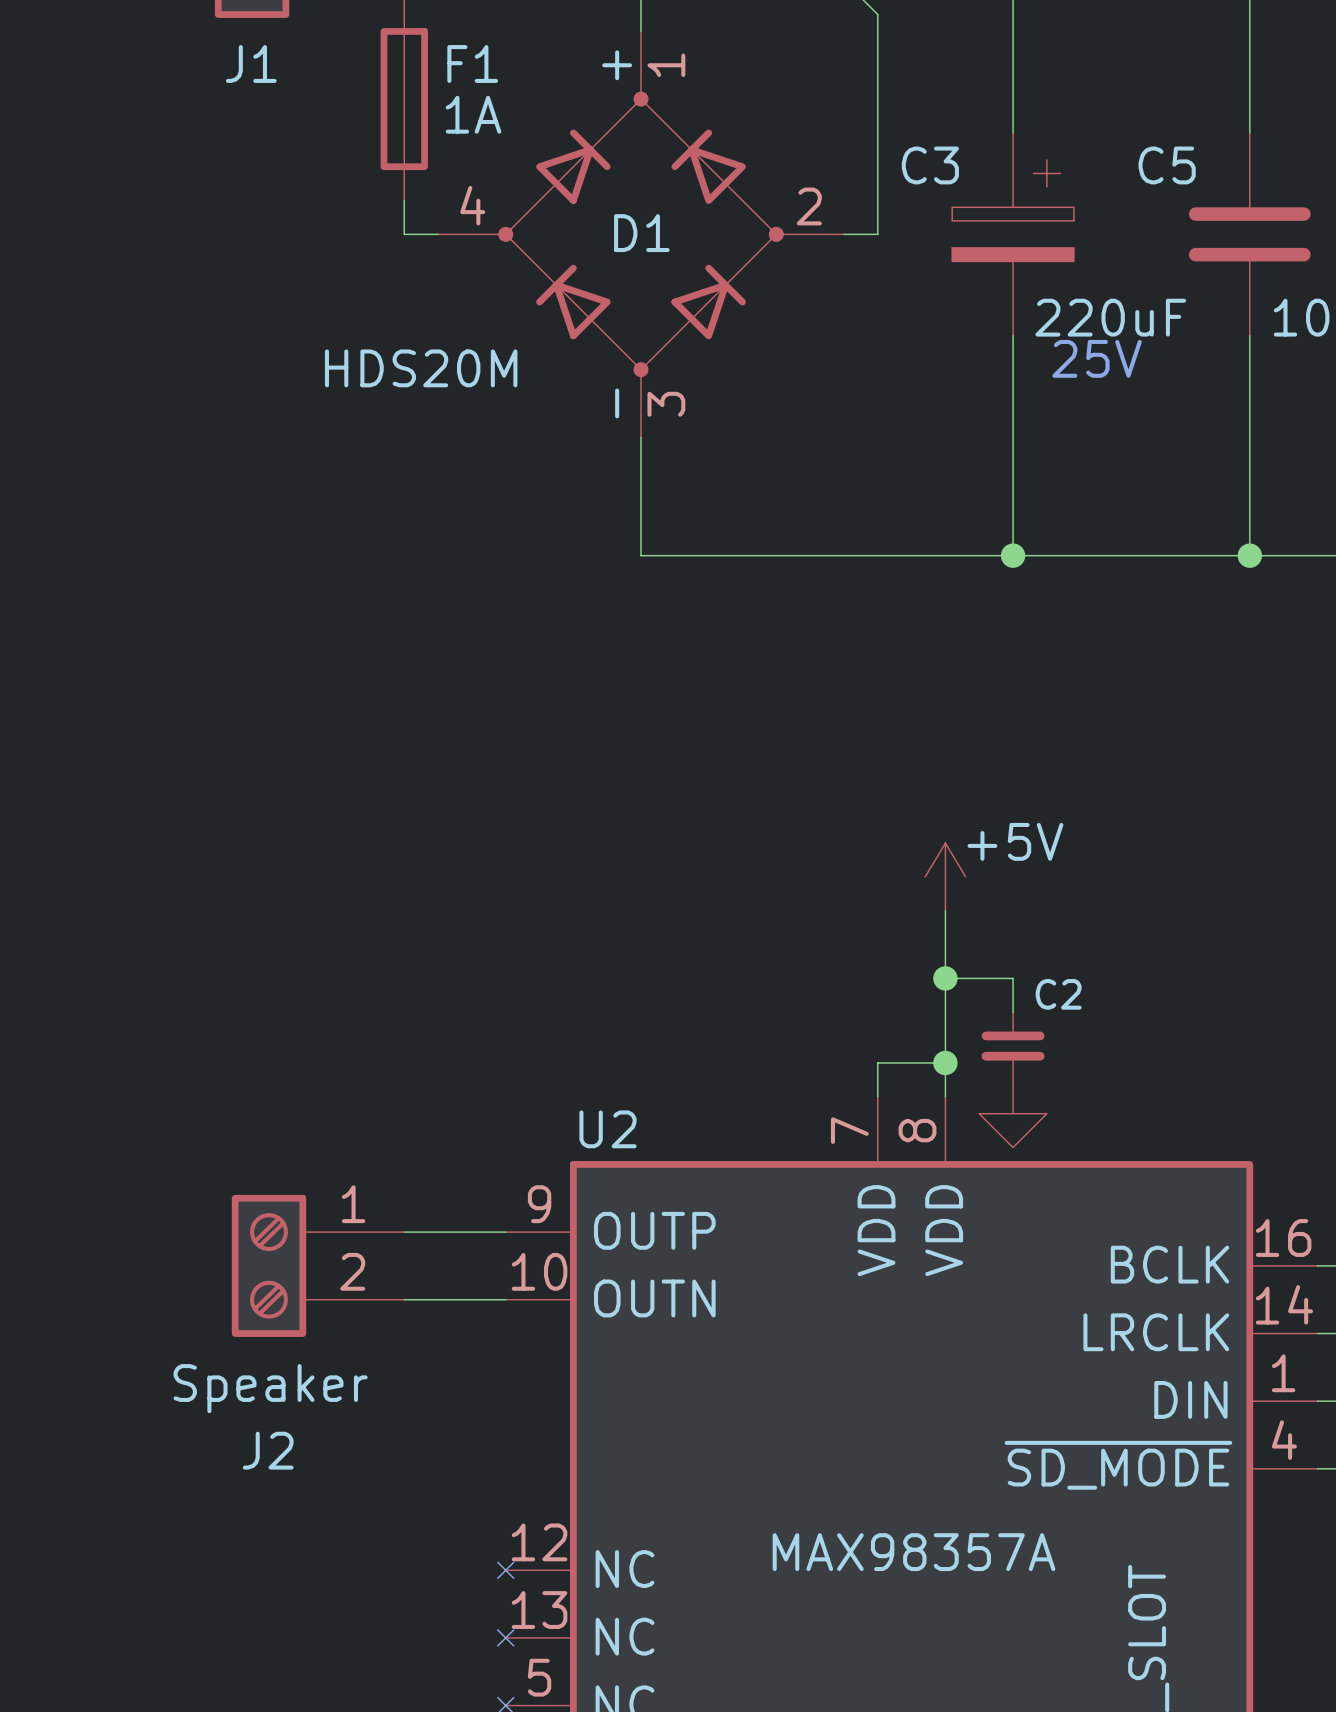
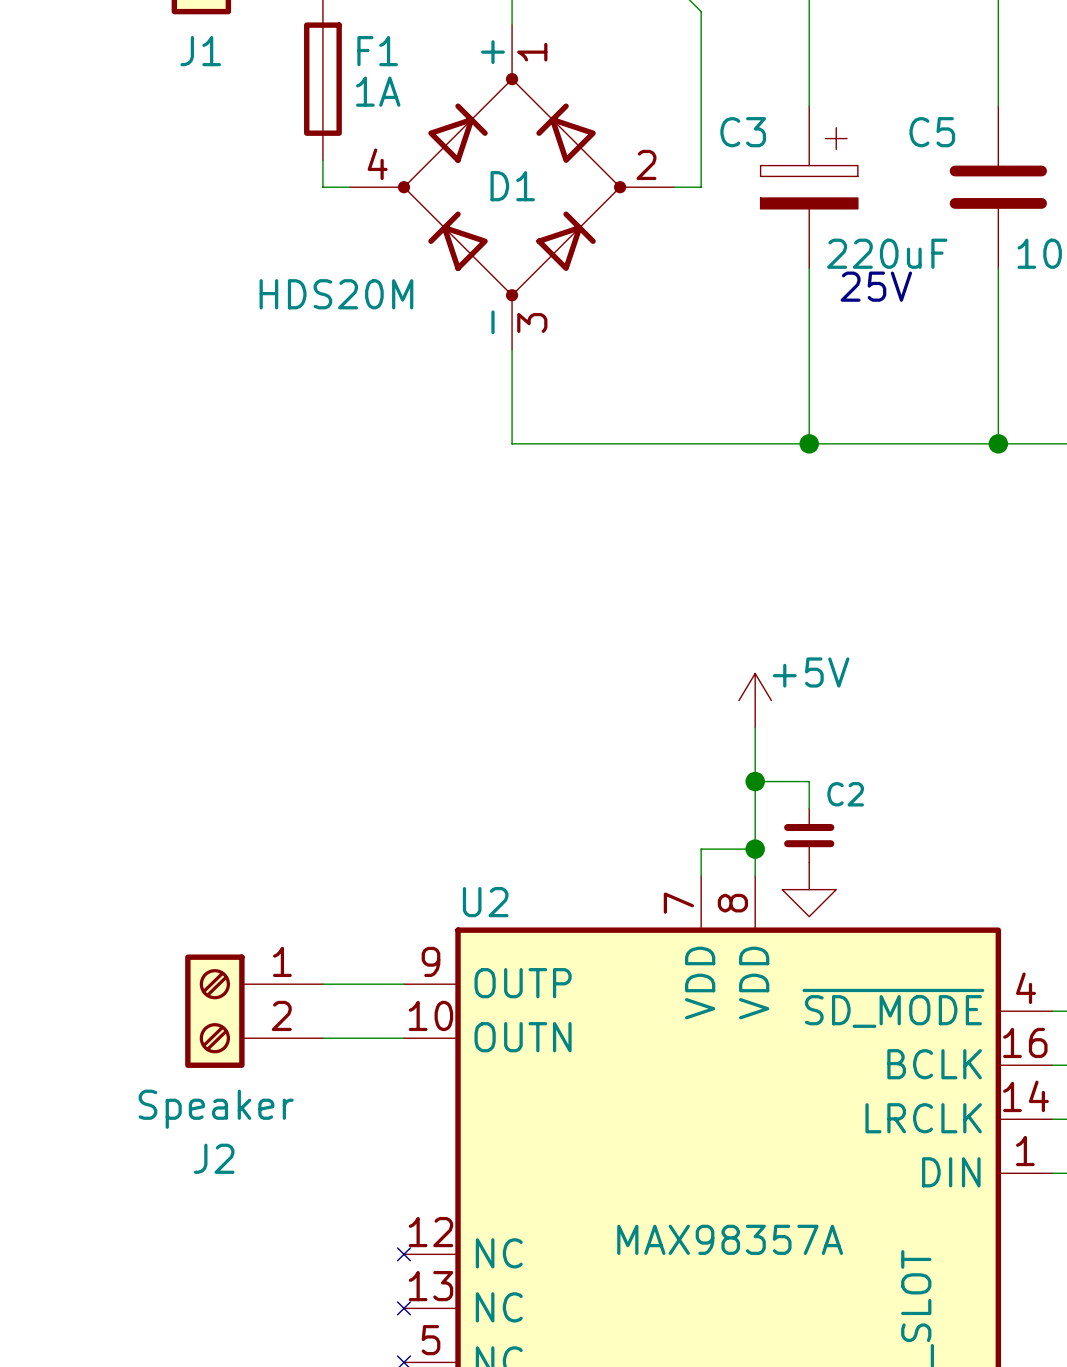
U2 pin number: 16 (1283, 1238) -> 4 (1026, 988)
U2 pin name: BCLK (1169, 1264) -> ~{SD_MODE} (893, 1008)
U2 pin number: 14 (1284, 1304) -> 16 (1025, 1042)
U2 pin name: LRCLK (1156, 1332) -> BCLK (934, 1064)
U2 pin number: 1 (1283, 1373) -> 14 (1026, 1096)
U2 pin name: DIN (1190, 1399) -> LRCLK (923, 1118)
U2 pin number: 4 (1284, 1440) -> 1 (1025, 1151)
U2 pin name: ~{SD_MODE} (1118, 1465) -> DIN (951, 1172)

